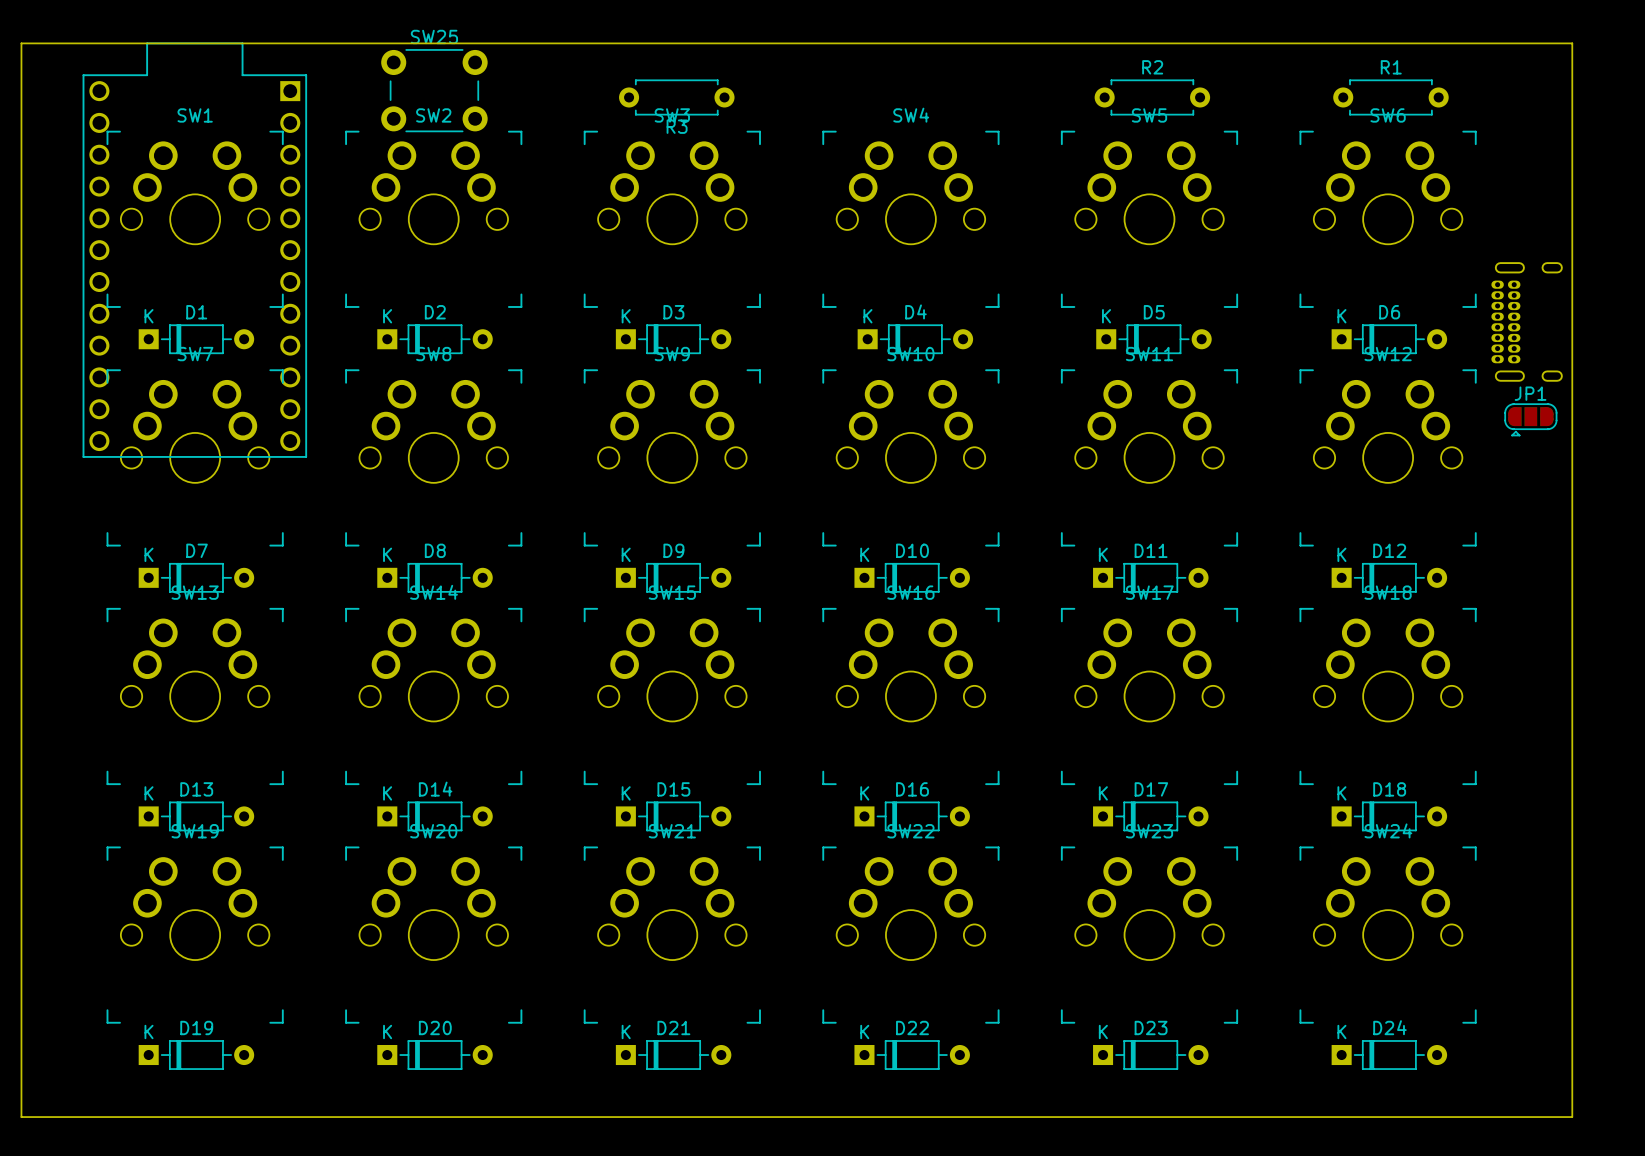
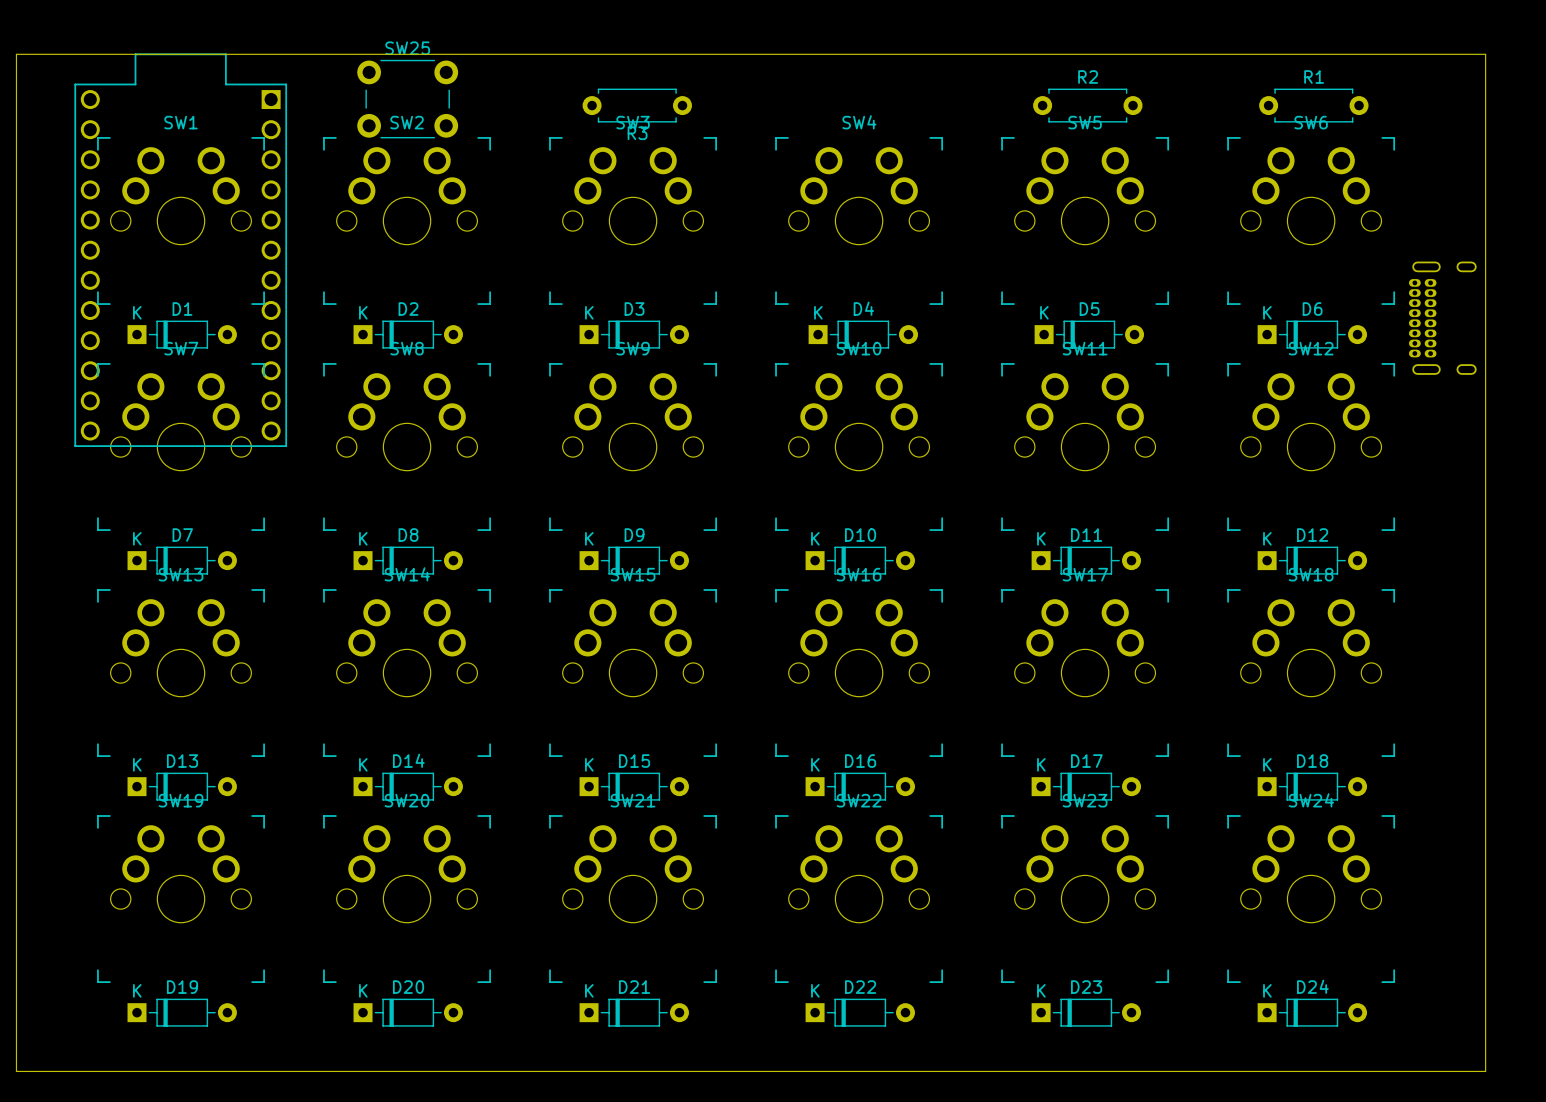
JP1: (1530, 419) -> none

